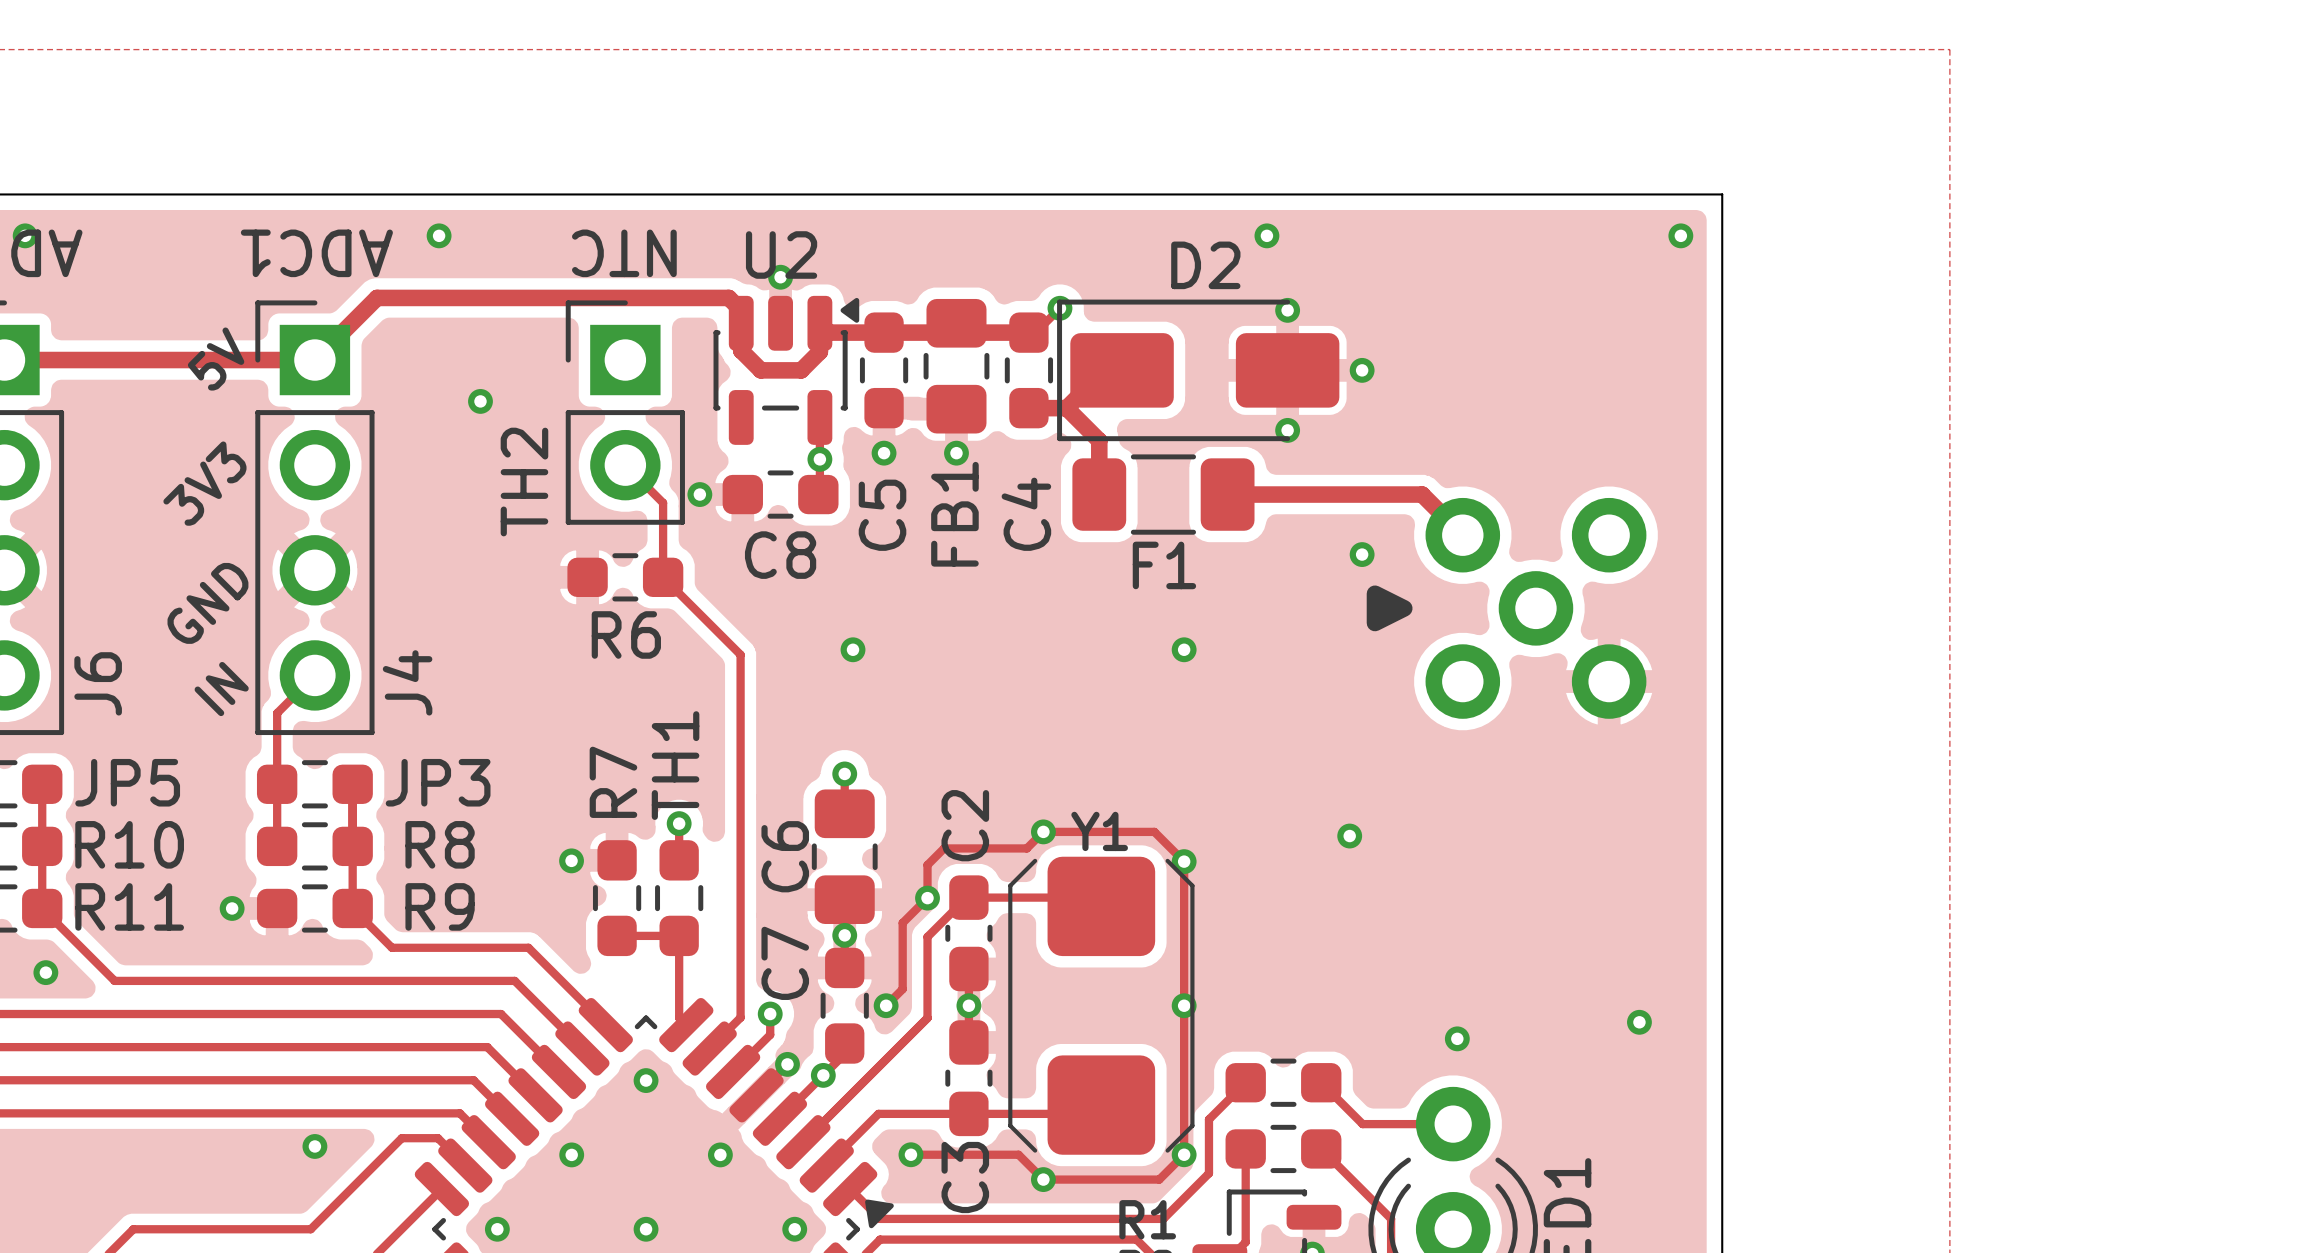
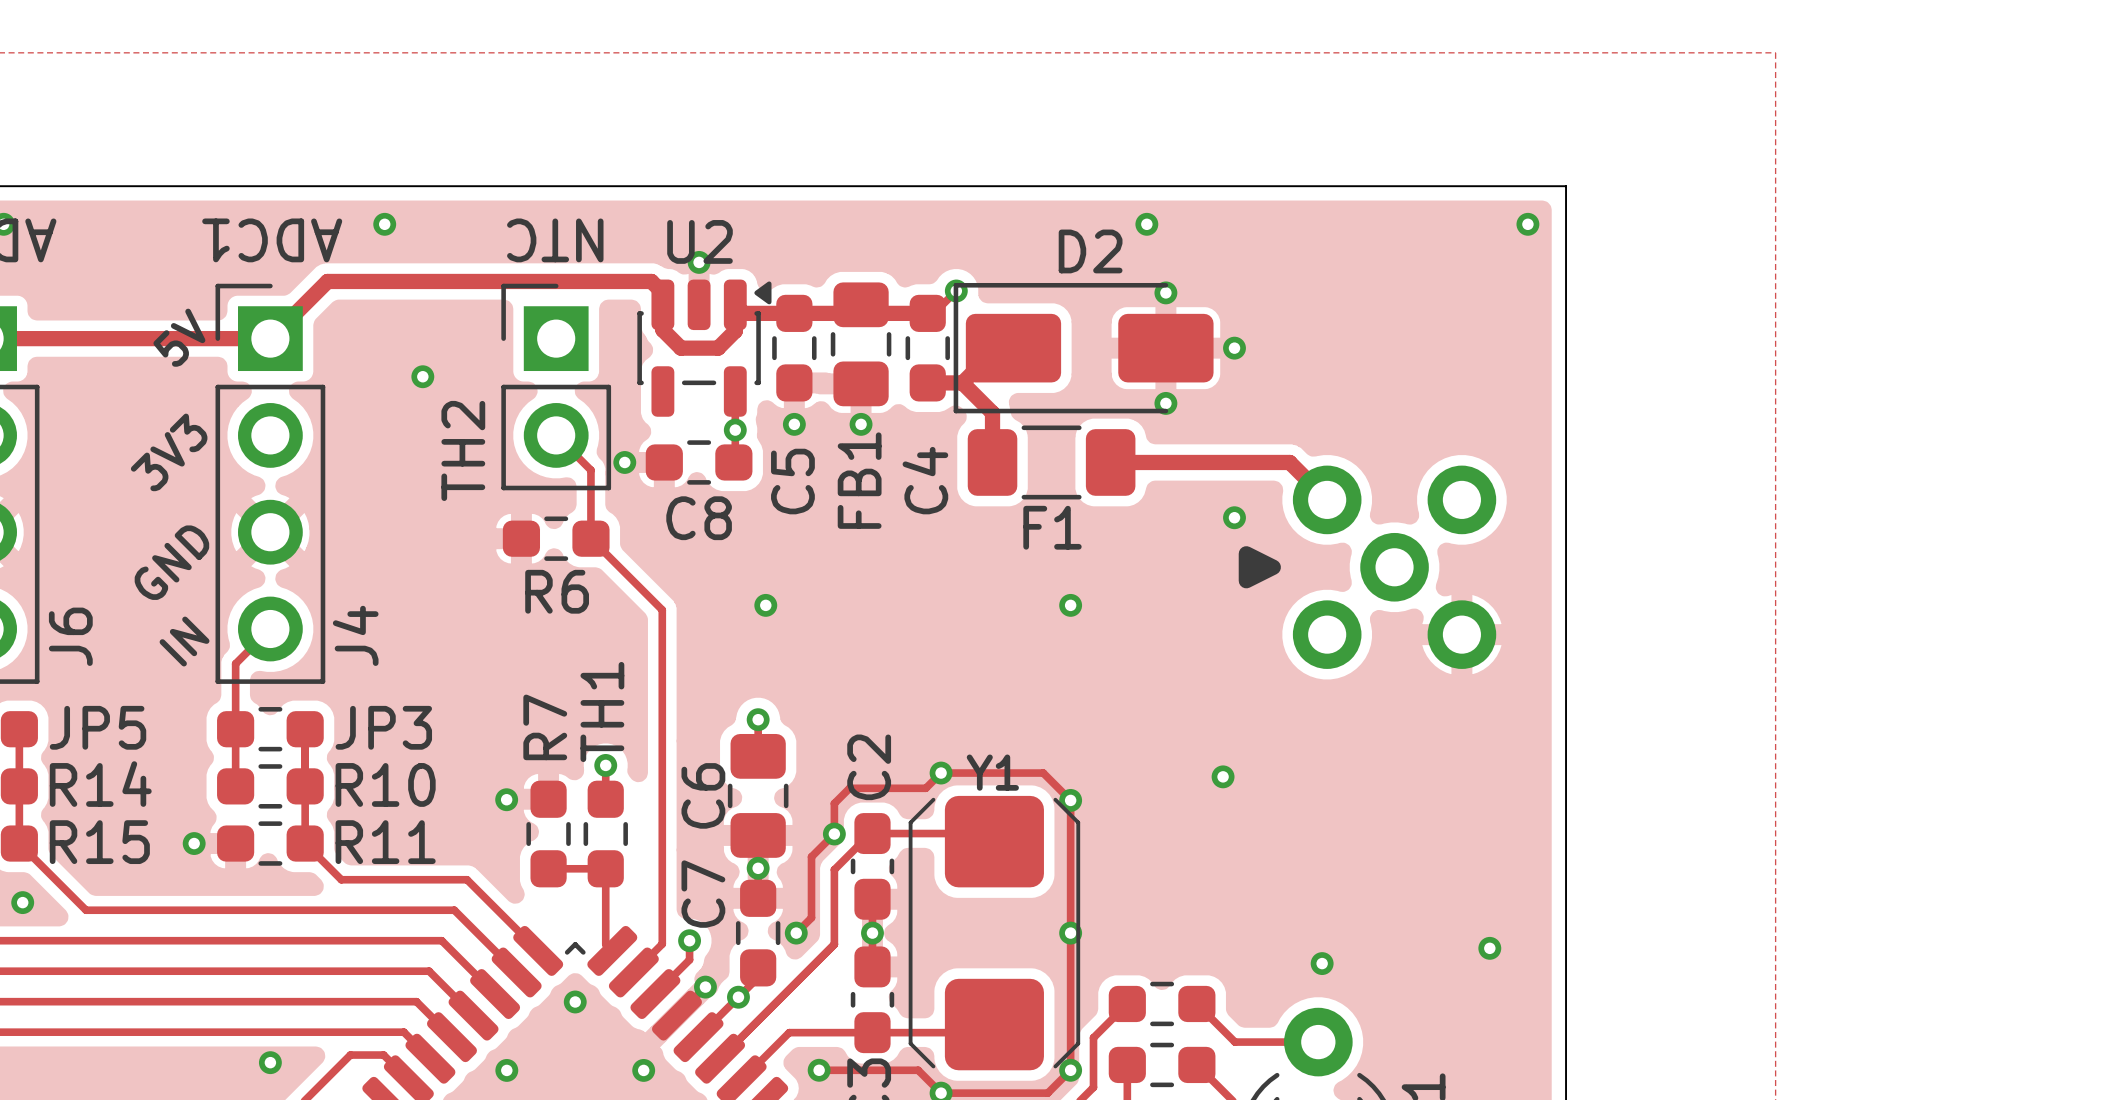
R10 name: R10 (129, 844) -> R14 (100, 784)
R8 name: R8 (440, 844) -> R10 (385, 784)
R11 name: R11 (129, 906) -> R15 (99, 842)
R9 name: R9 (440, 906) -> R11 (385, 842)

